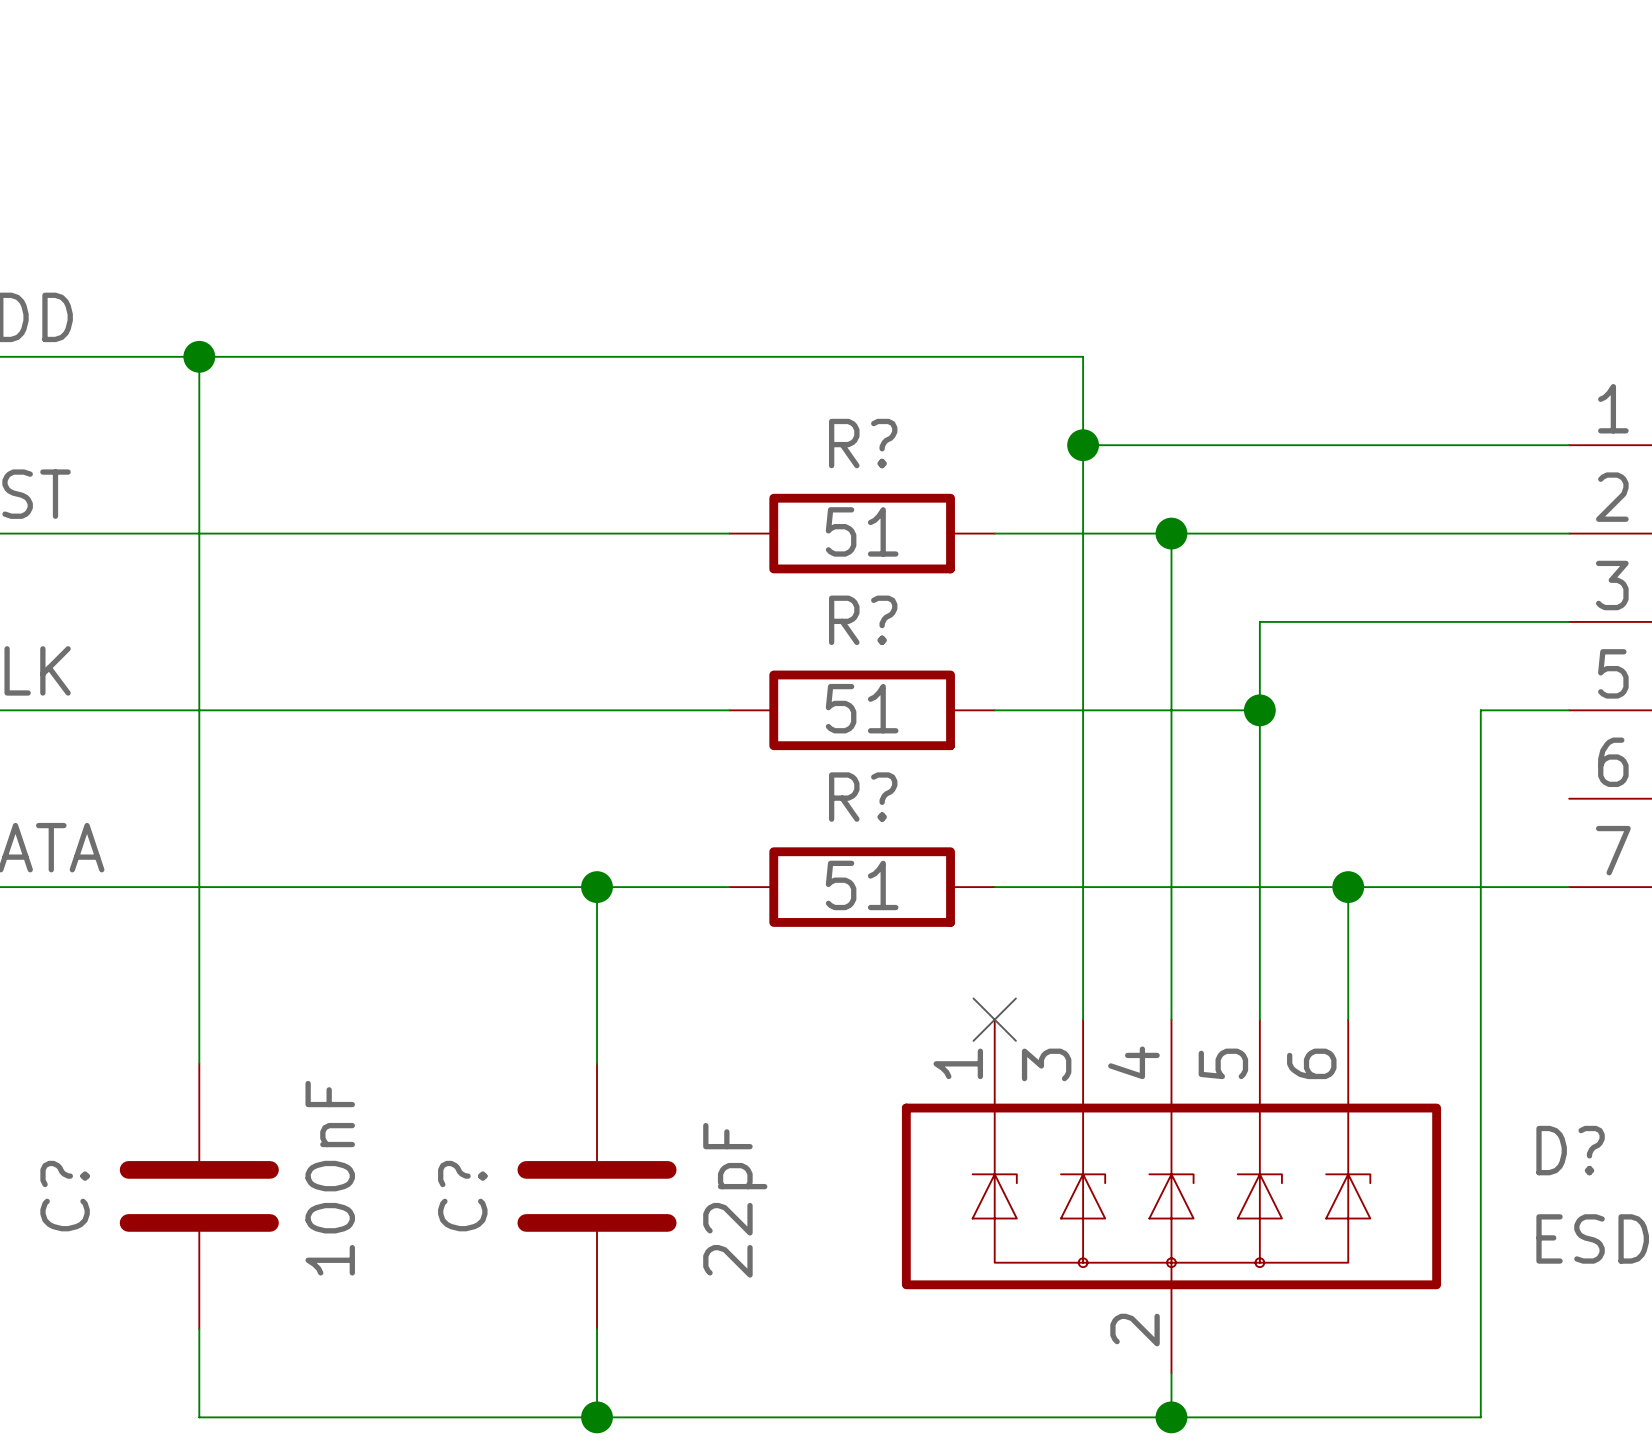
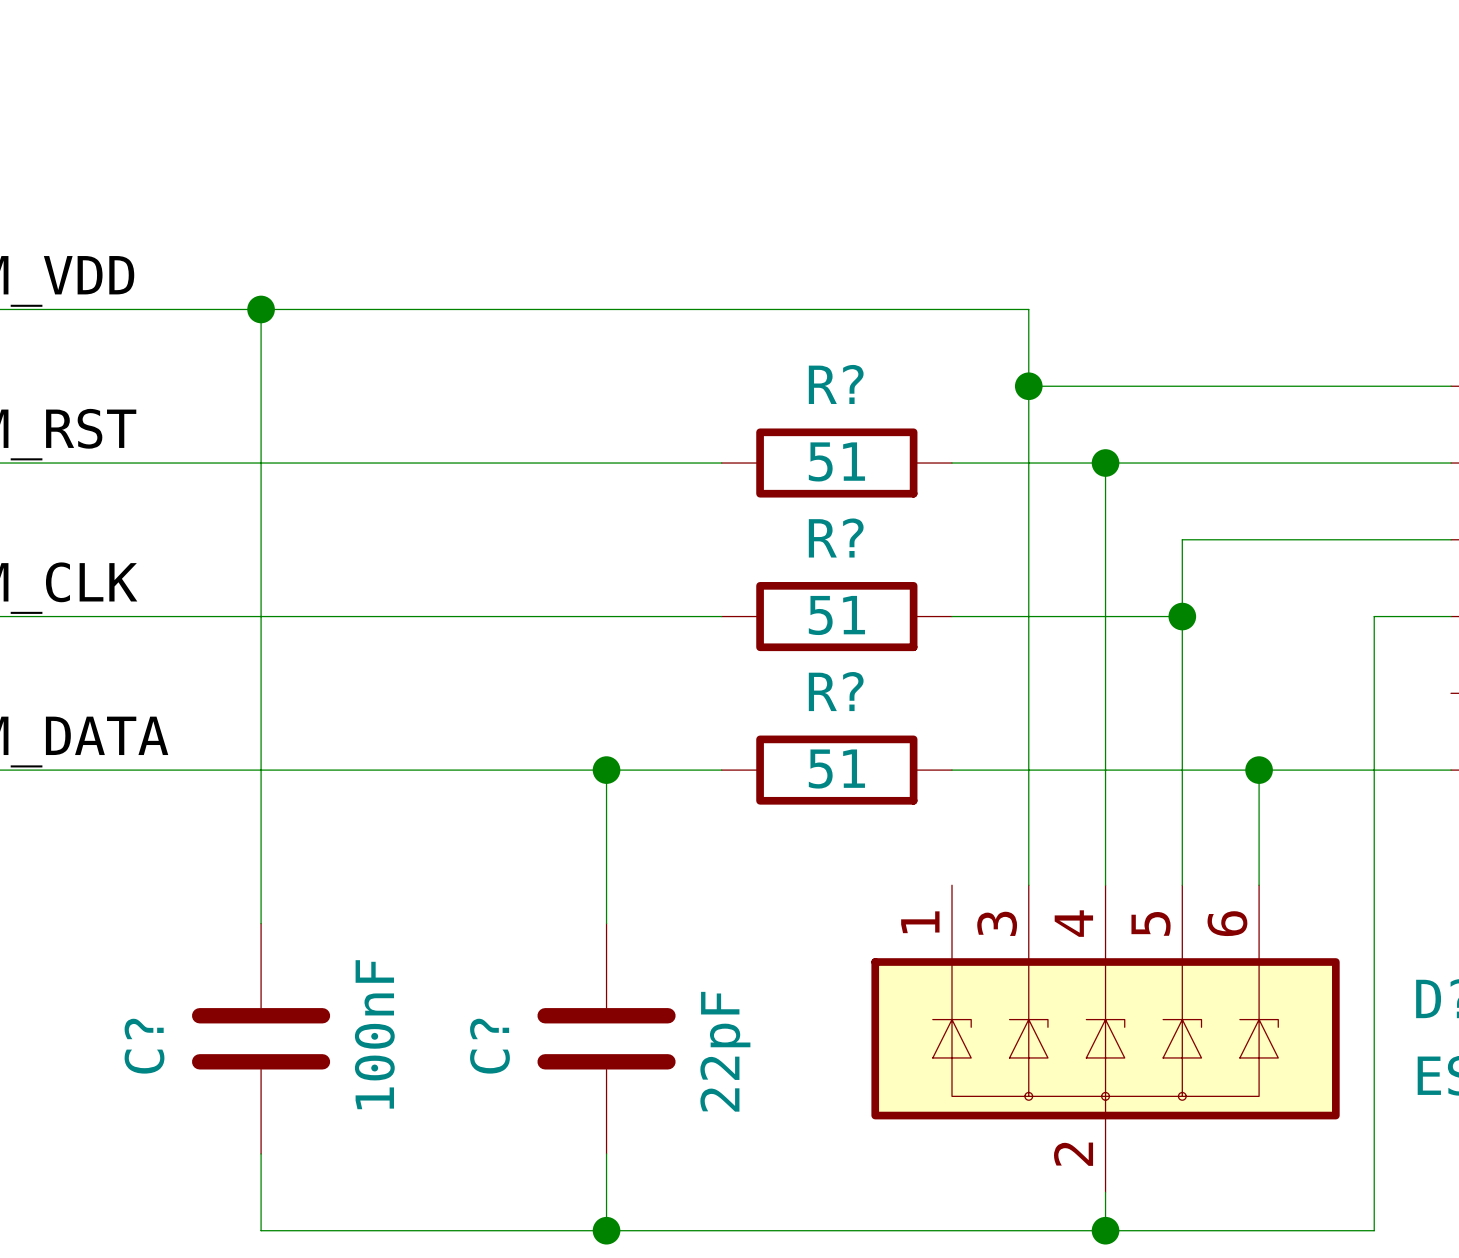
no-connect mark: (994, 1019) -> none

